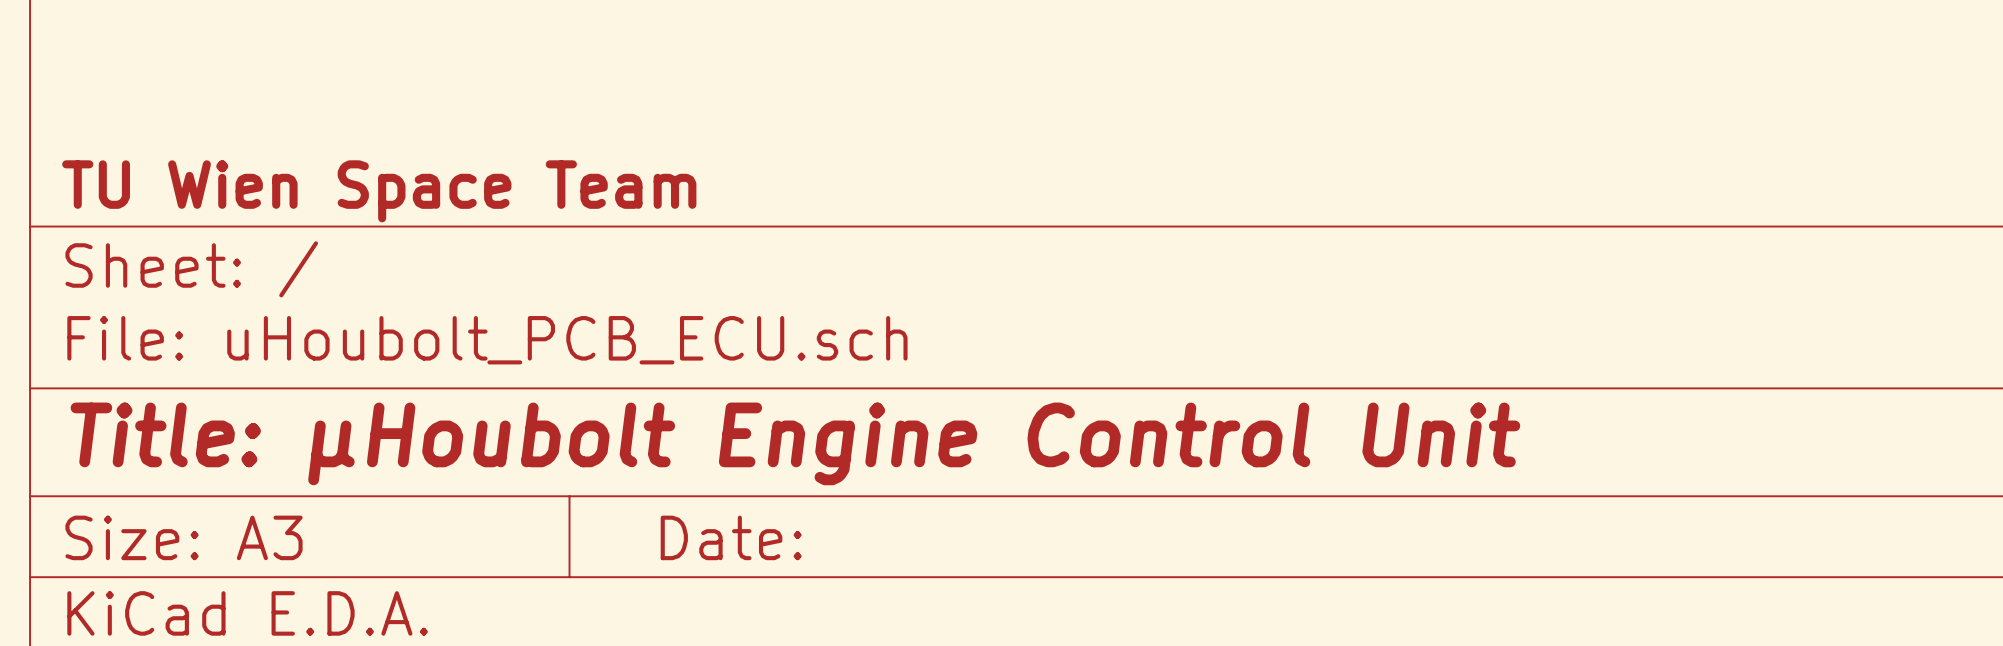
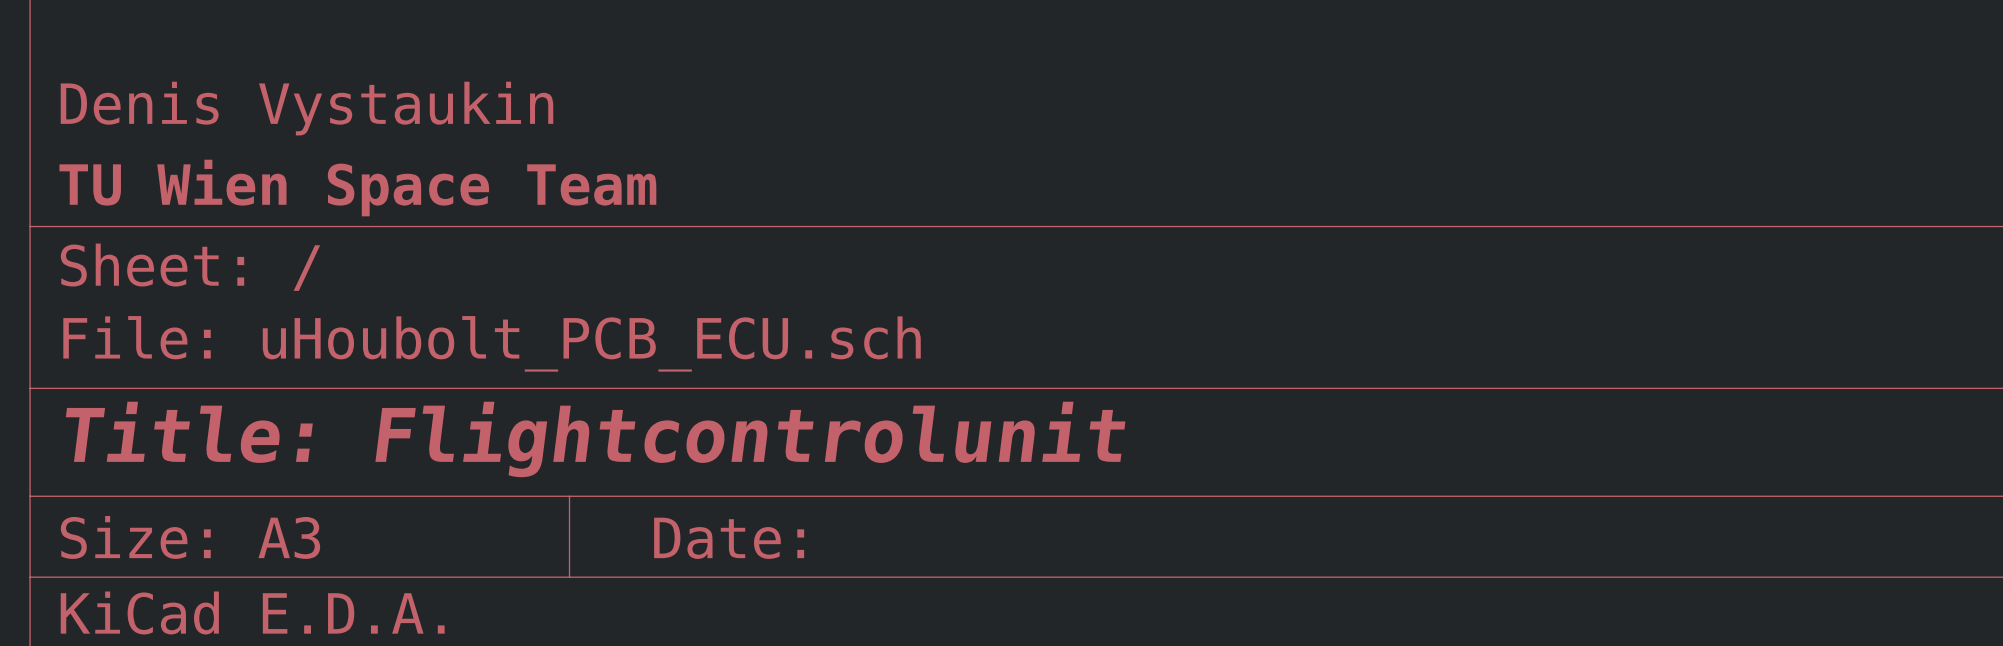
title block: none -> Denis Vystaukin (306, 108)
title block: Title: µHoubolt Engine Control Unit (795, 443) -> Title: Flightcontrolunit (595, 439)

